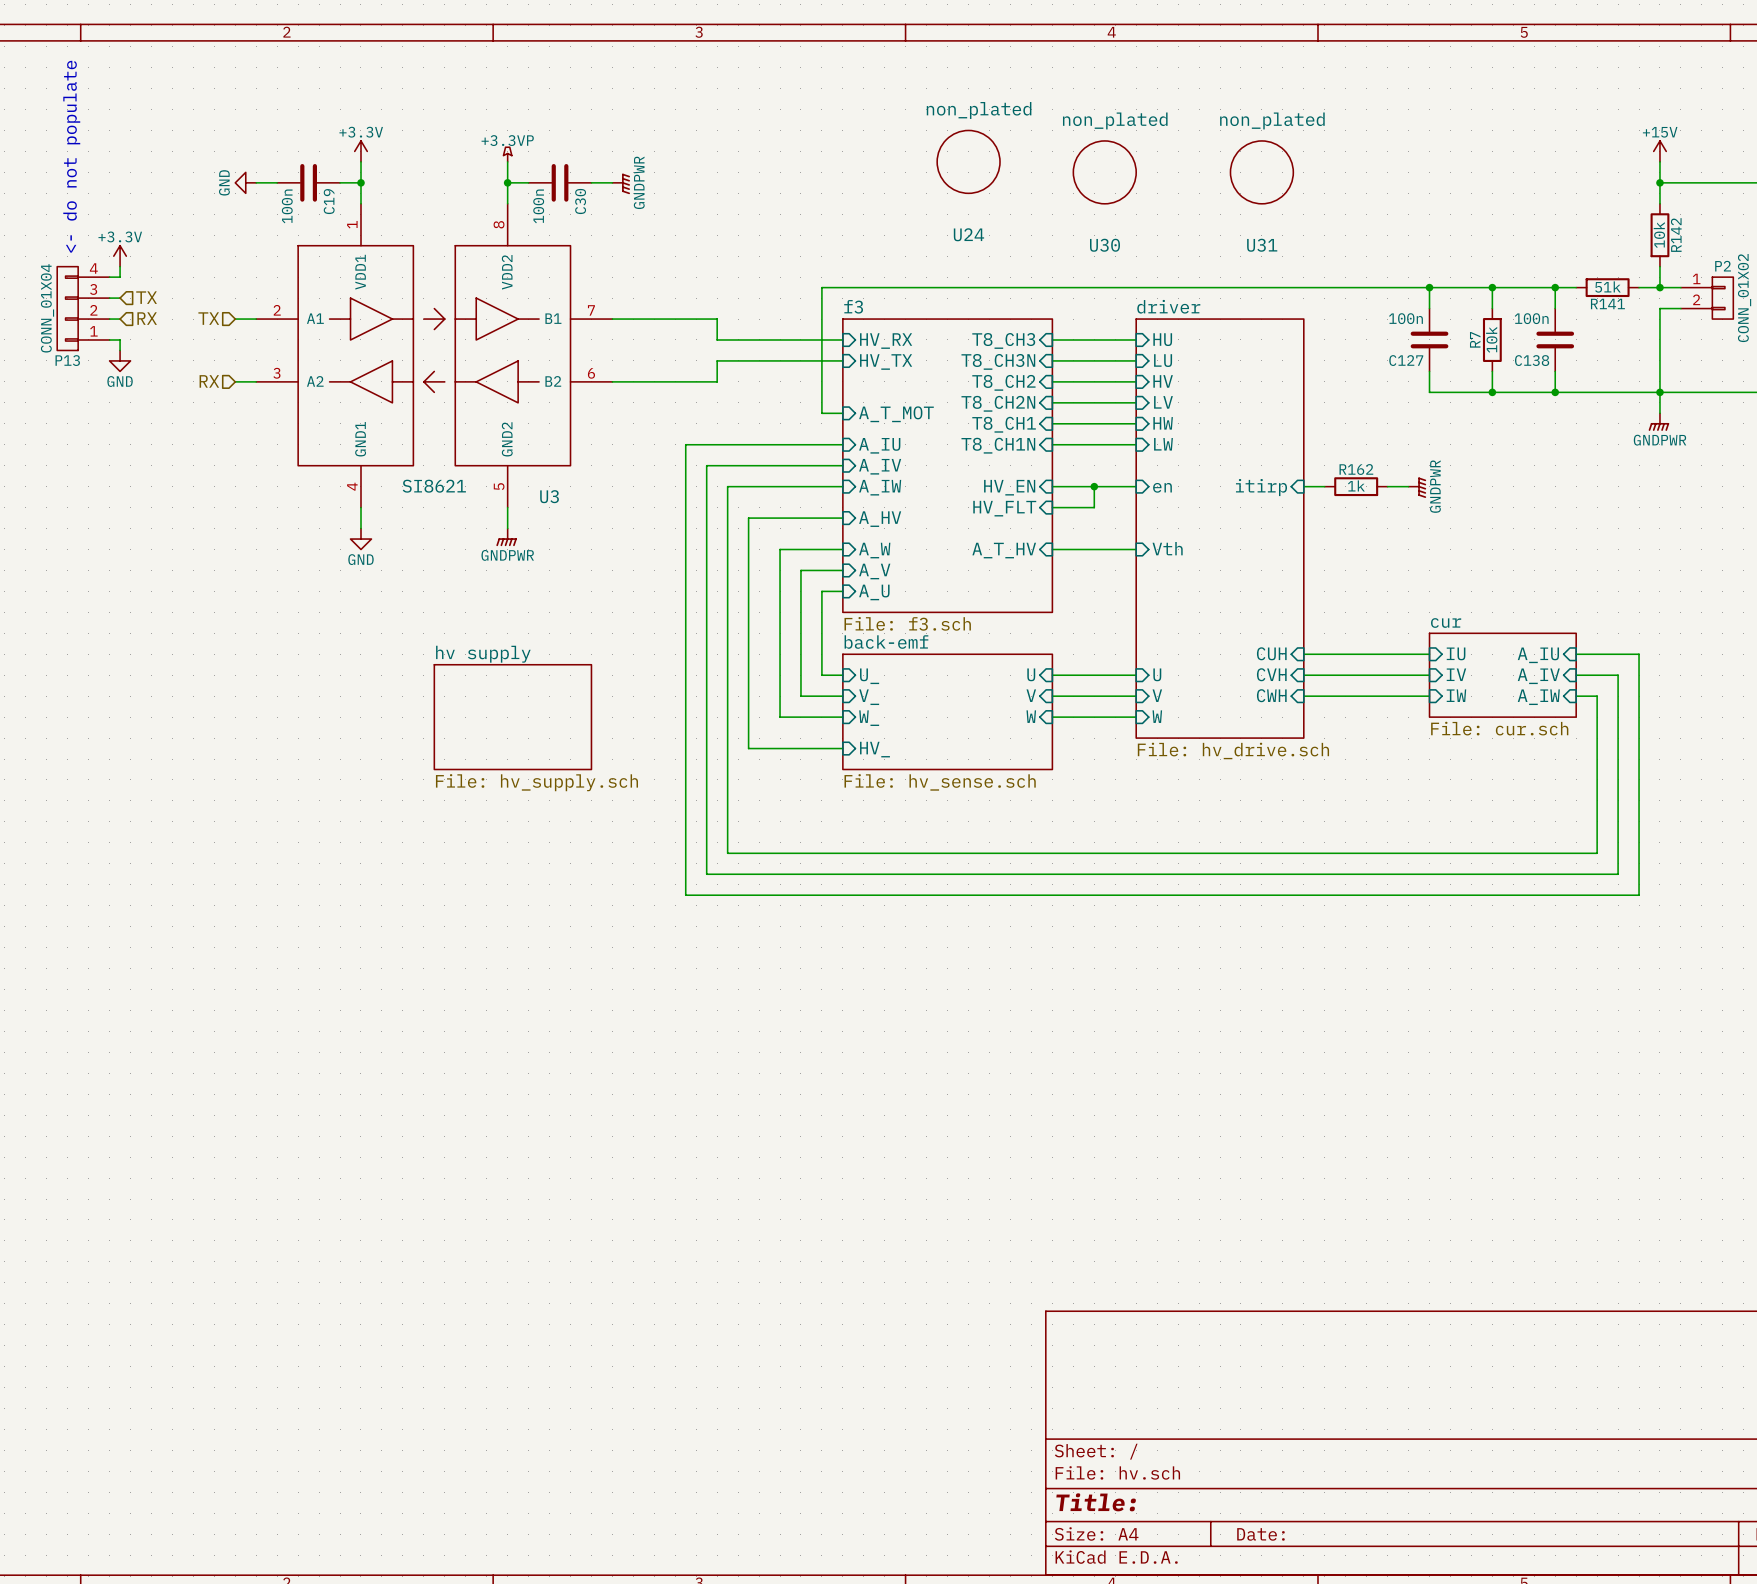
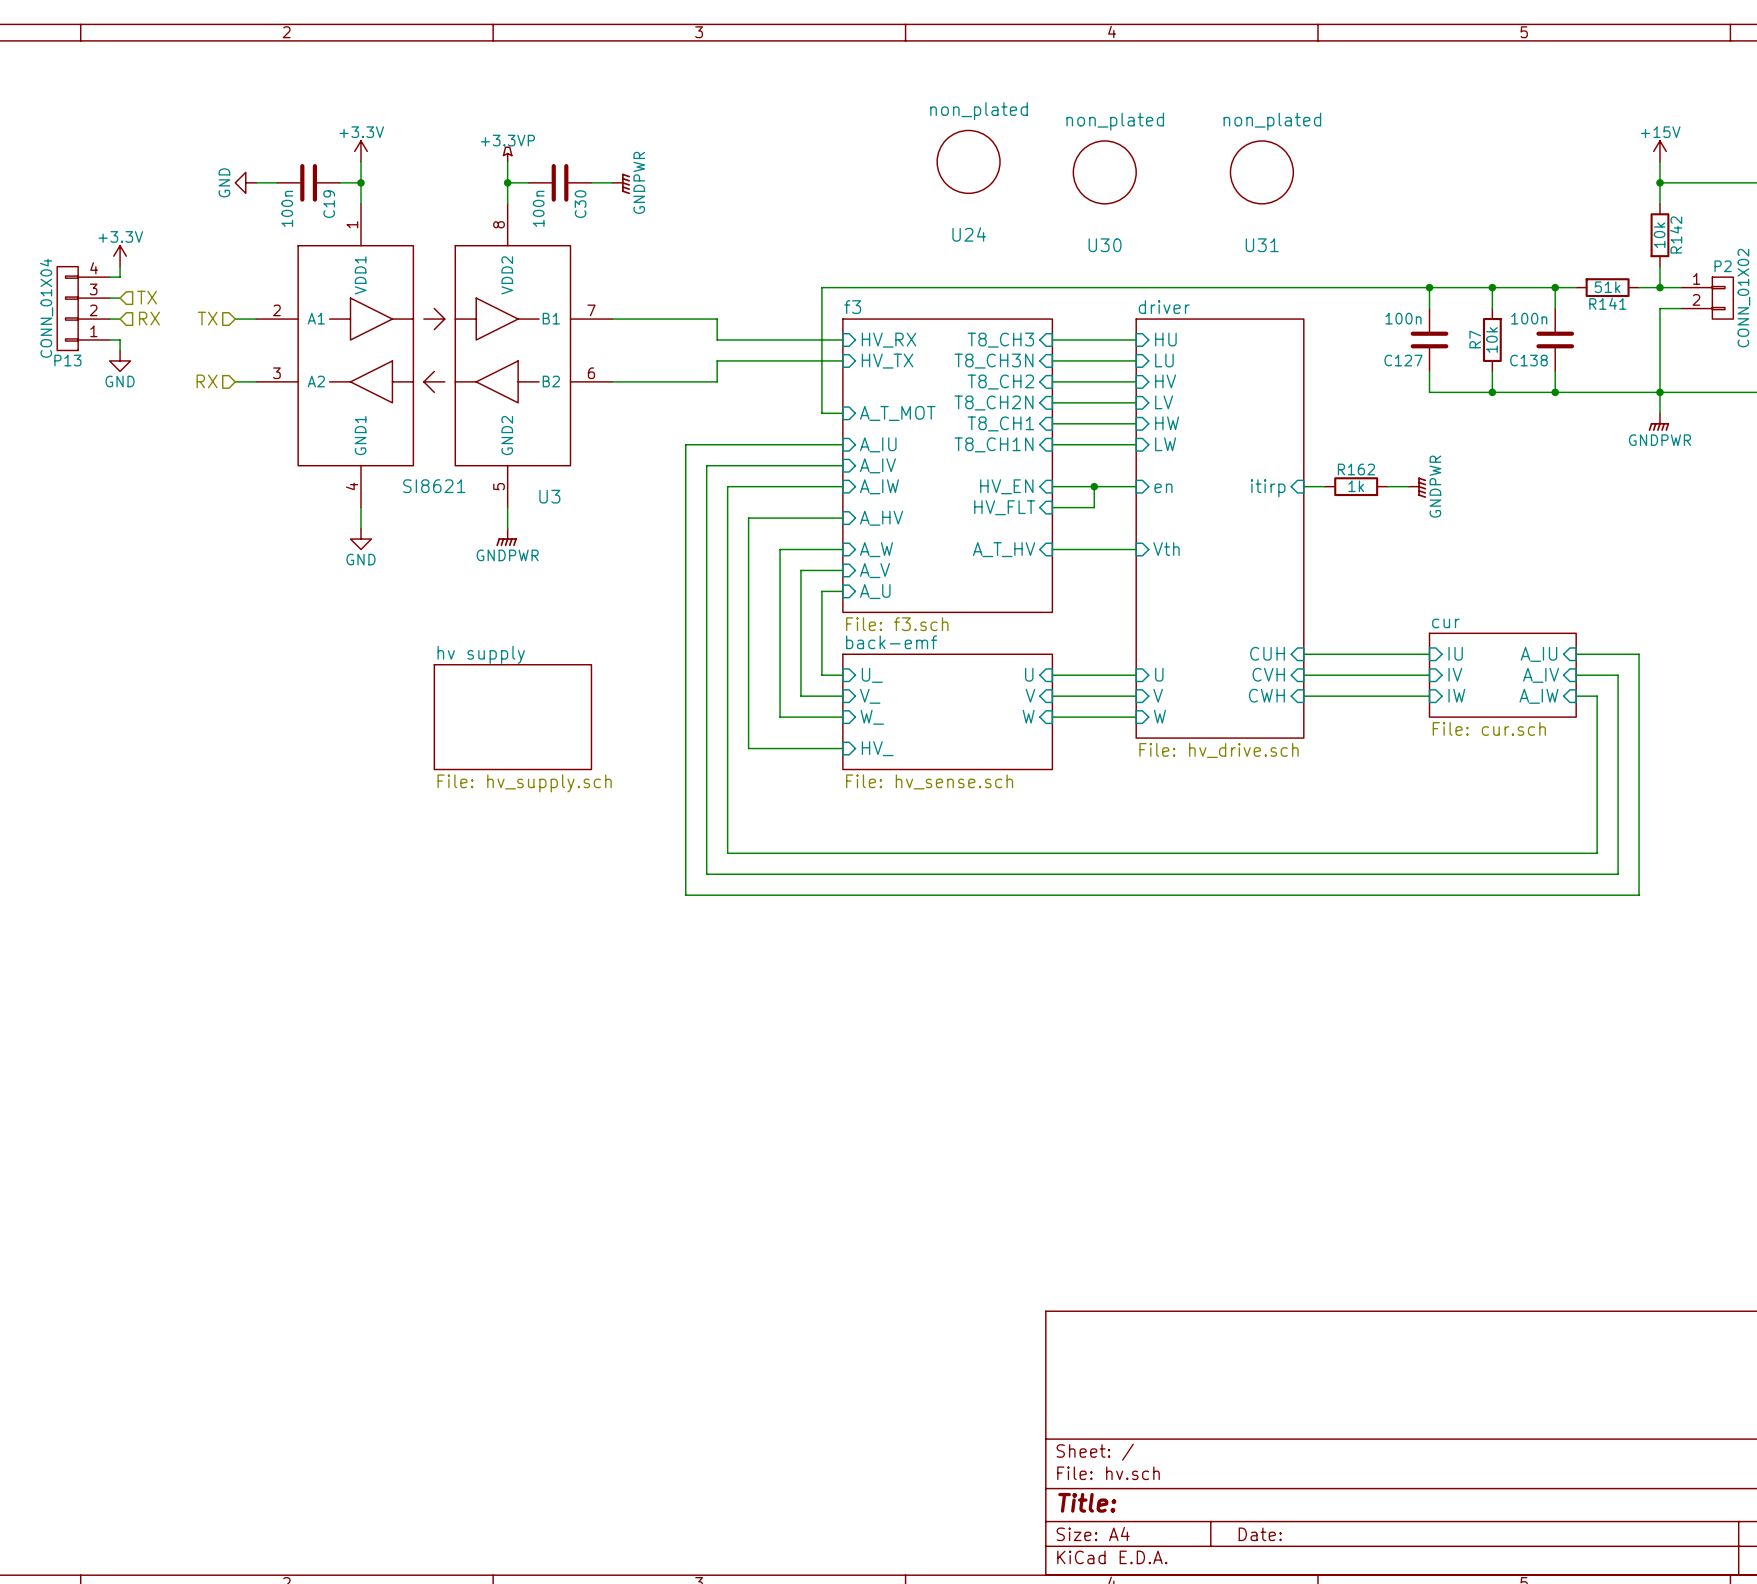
text: <- do not populate (71, 156) -> none

